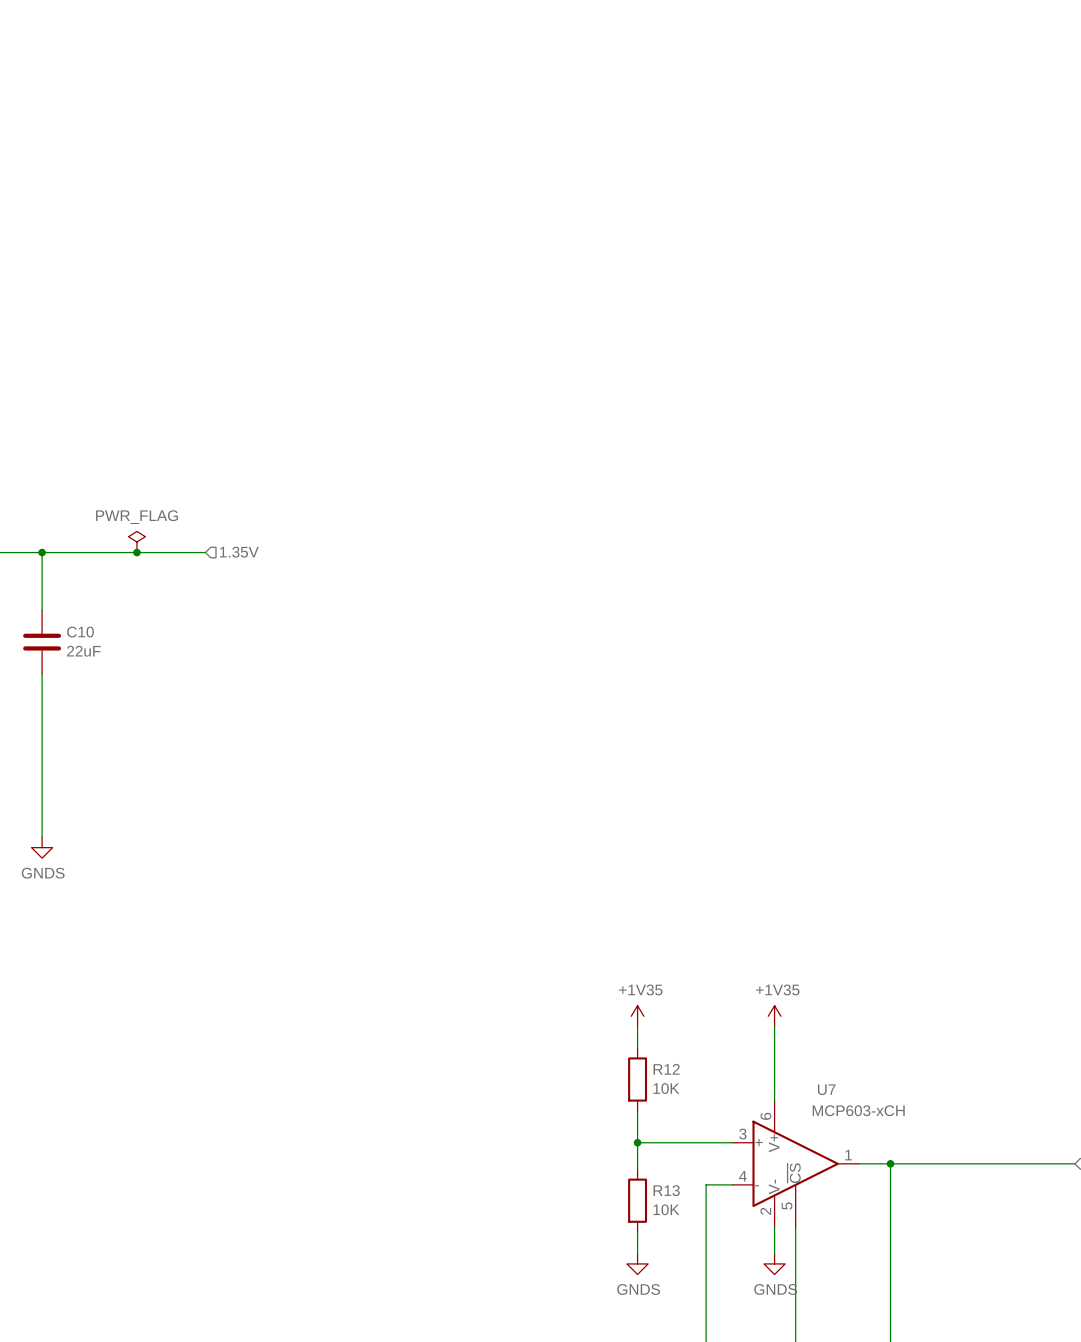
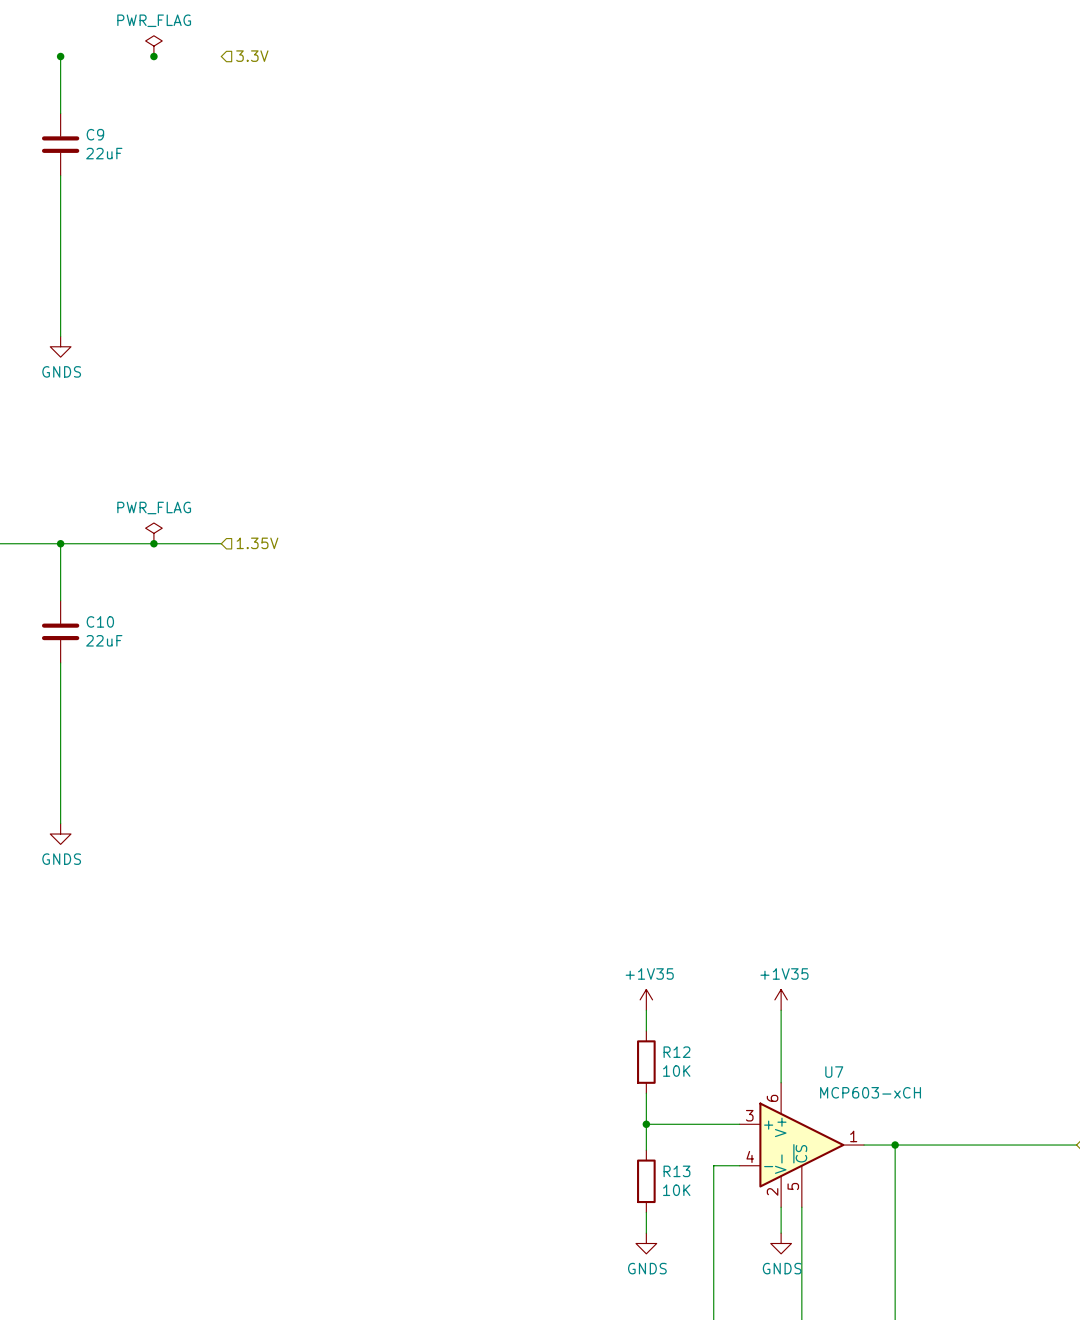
power symbol: none -> PWR_FLAG (153, 46)
hierarchical label: none -> 3.3V (252, 56)
wire: none -> (60, 56) (60, 113)
junction: none -> (60, 56)
junction: none -> (153, 56)
C9: none -> 22uF (60, 144)
wire: none -> (60, 175) (60, 336)
power symbol: none -> GNDS (60, 346)

